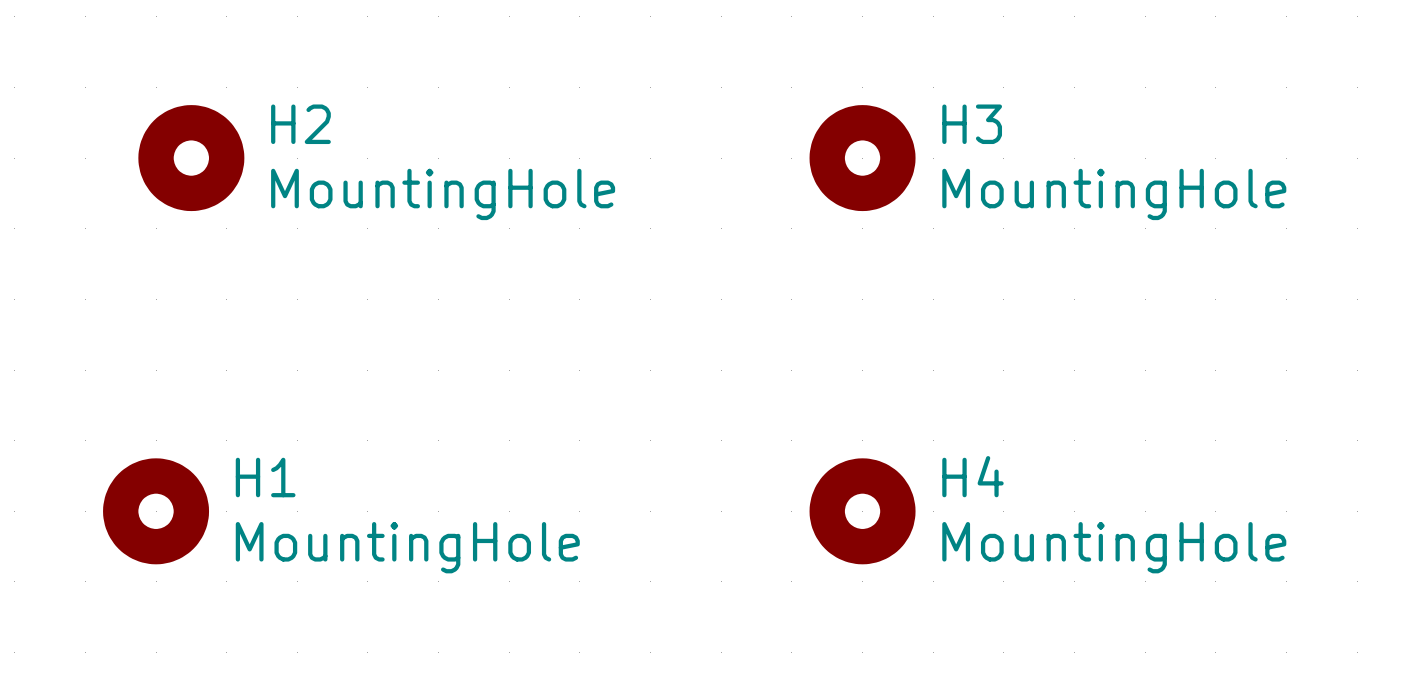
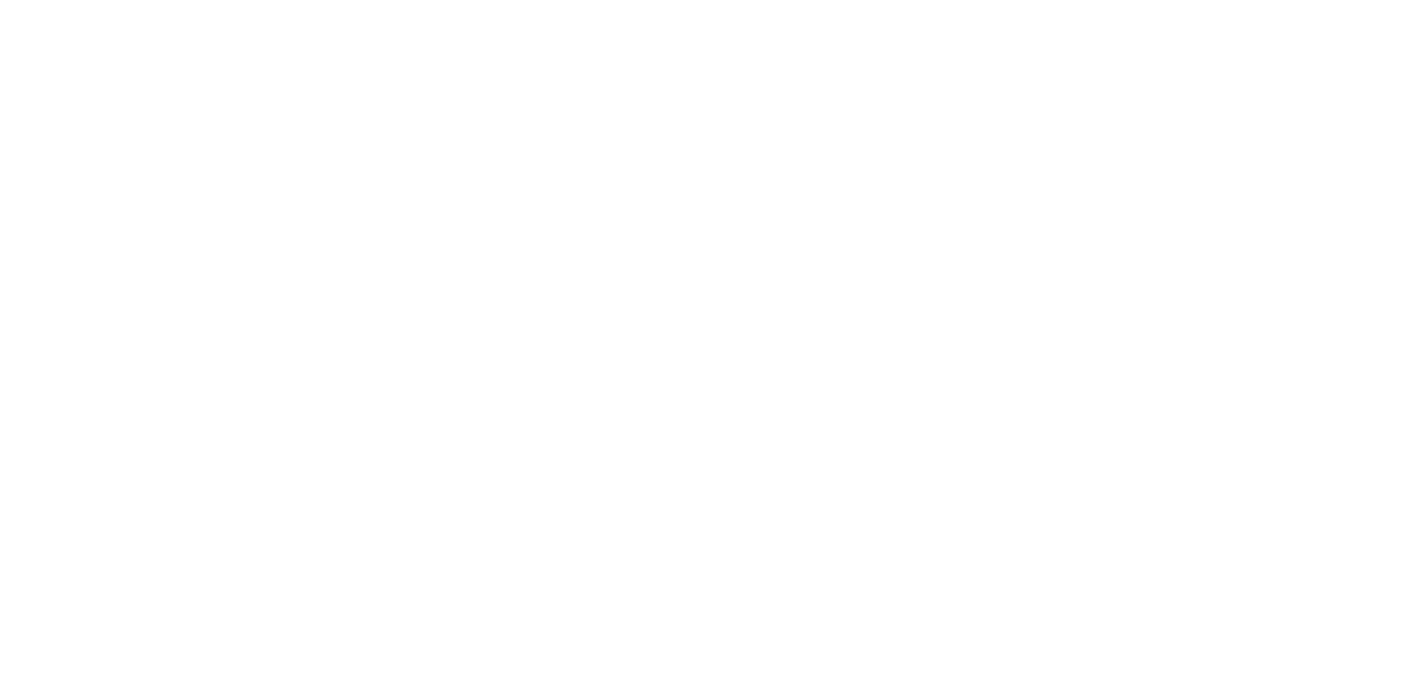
H2: MountingHole (191, 158) -> none
H3: MountingHole (862, 158) -> none
H1: MountingHole (156, 511) -> none
H4: MountingHole (862, 511) -> none

